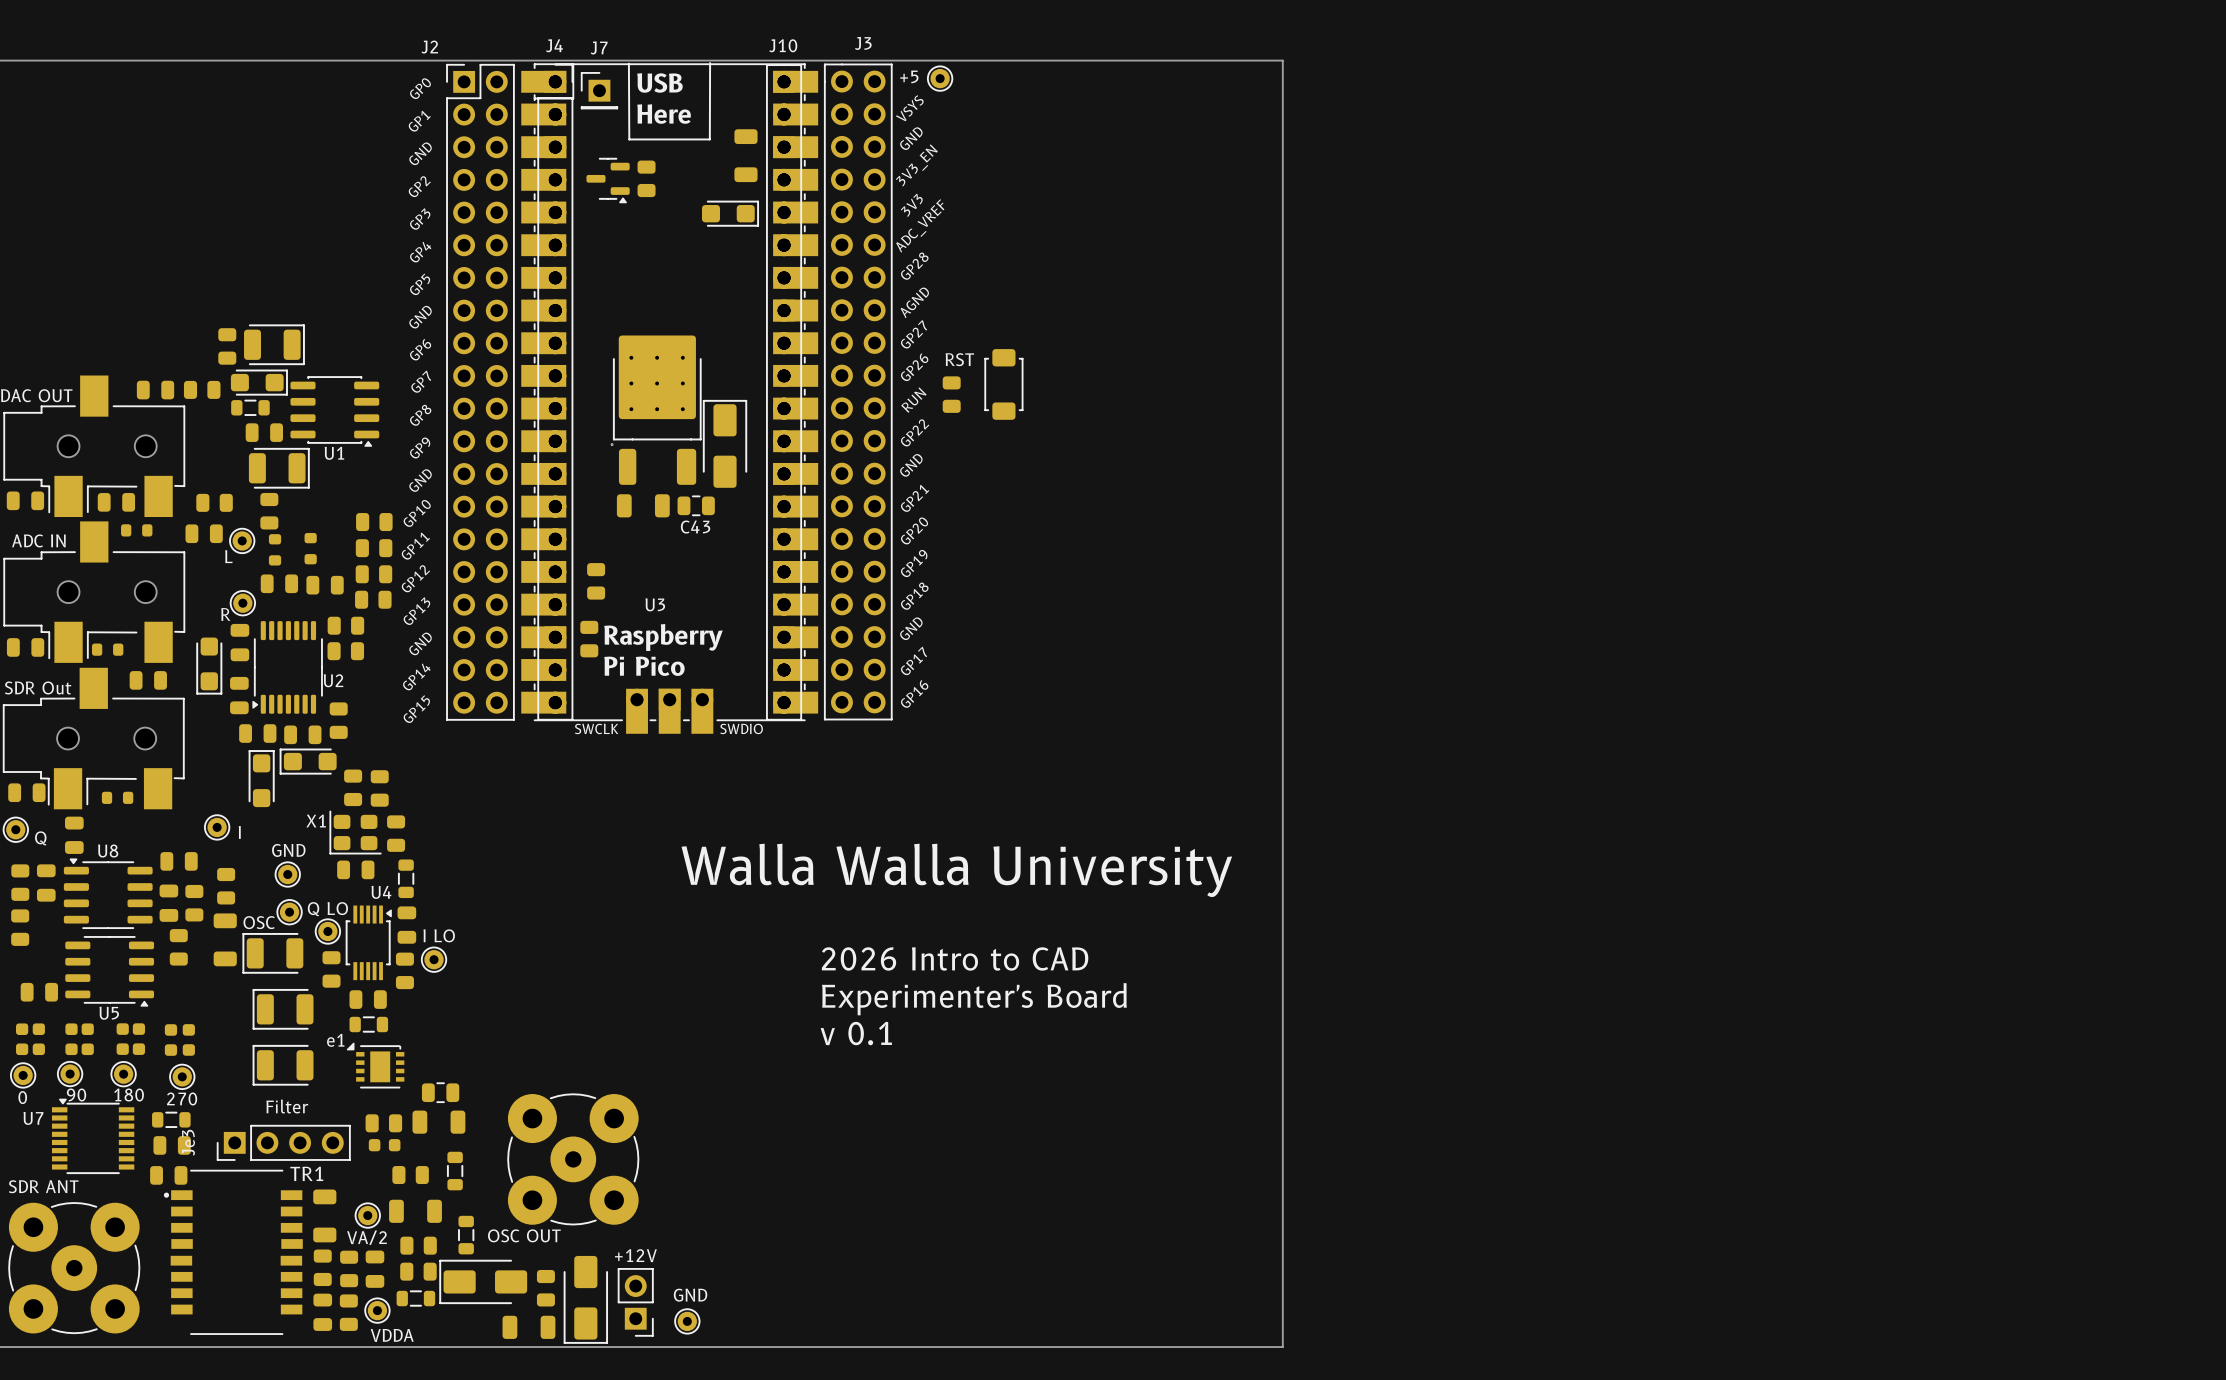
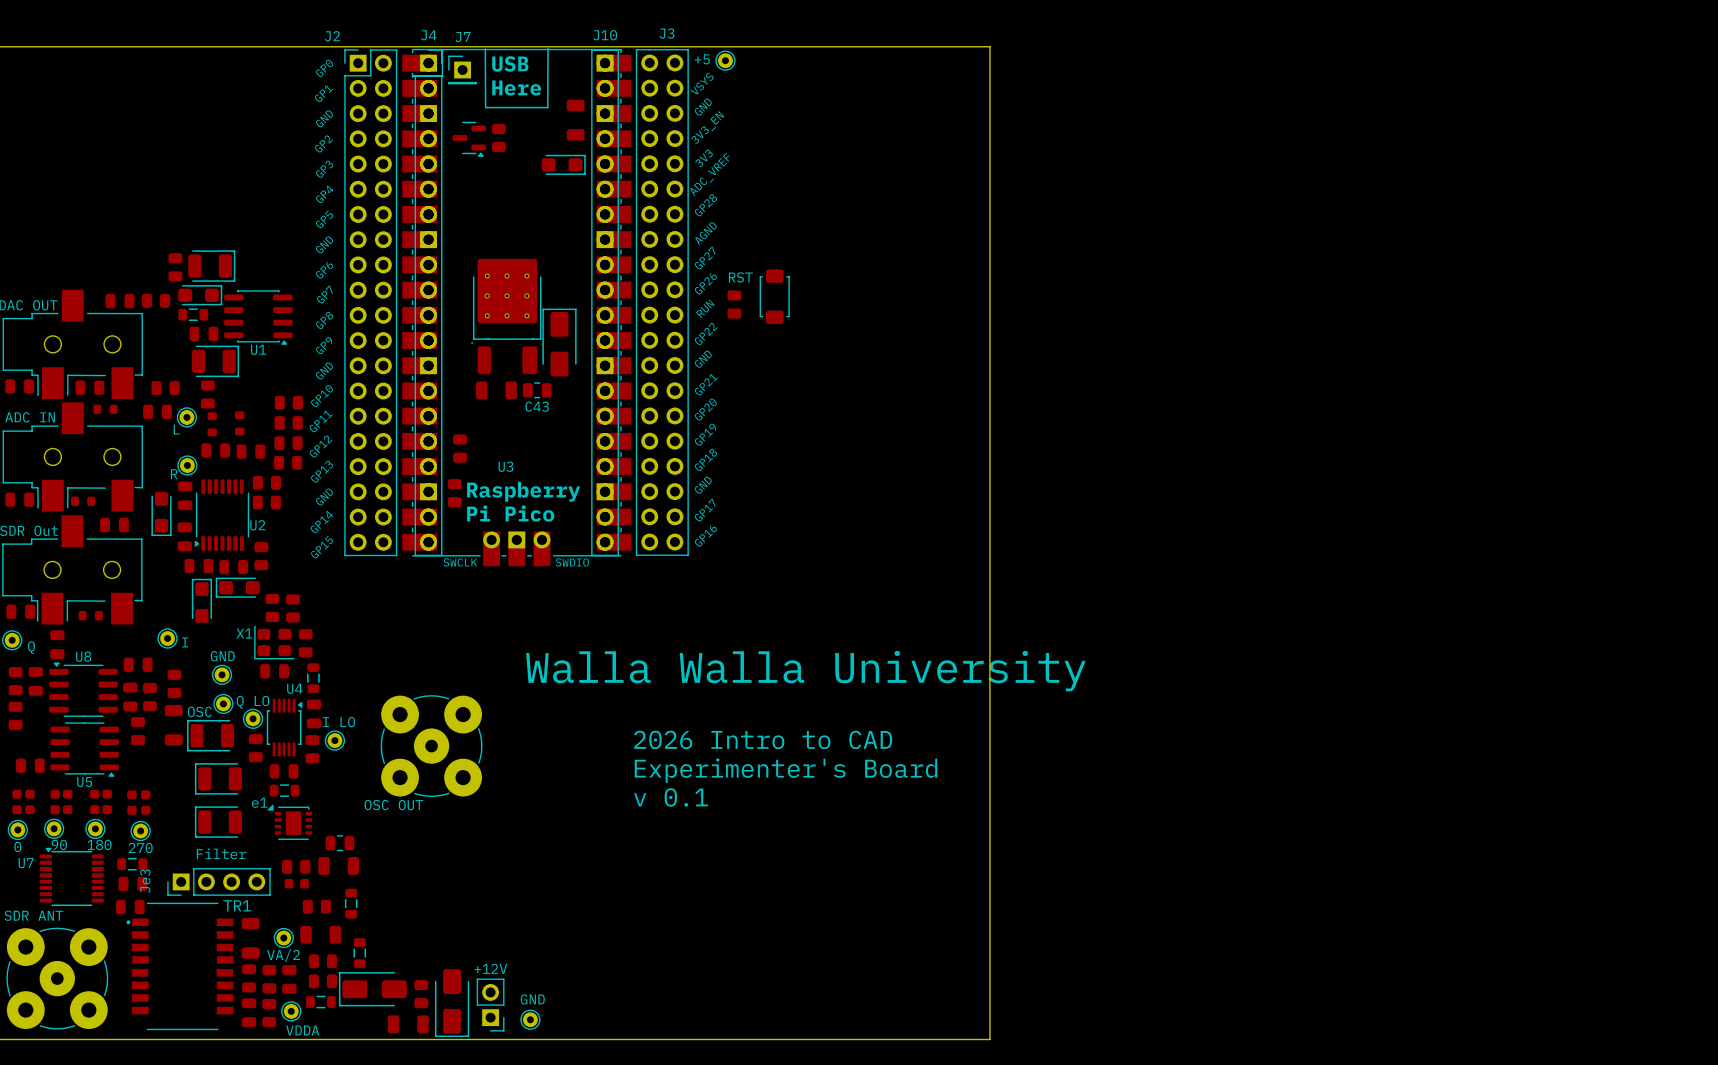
part position: (573, 1159) -> (431, 746)

